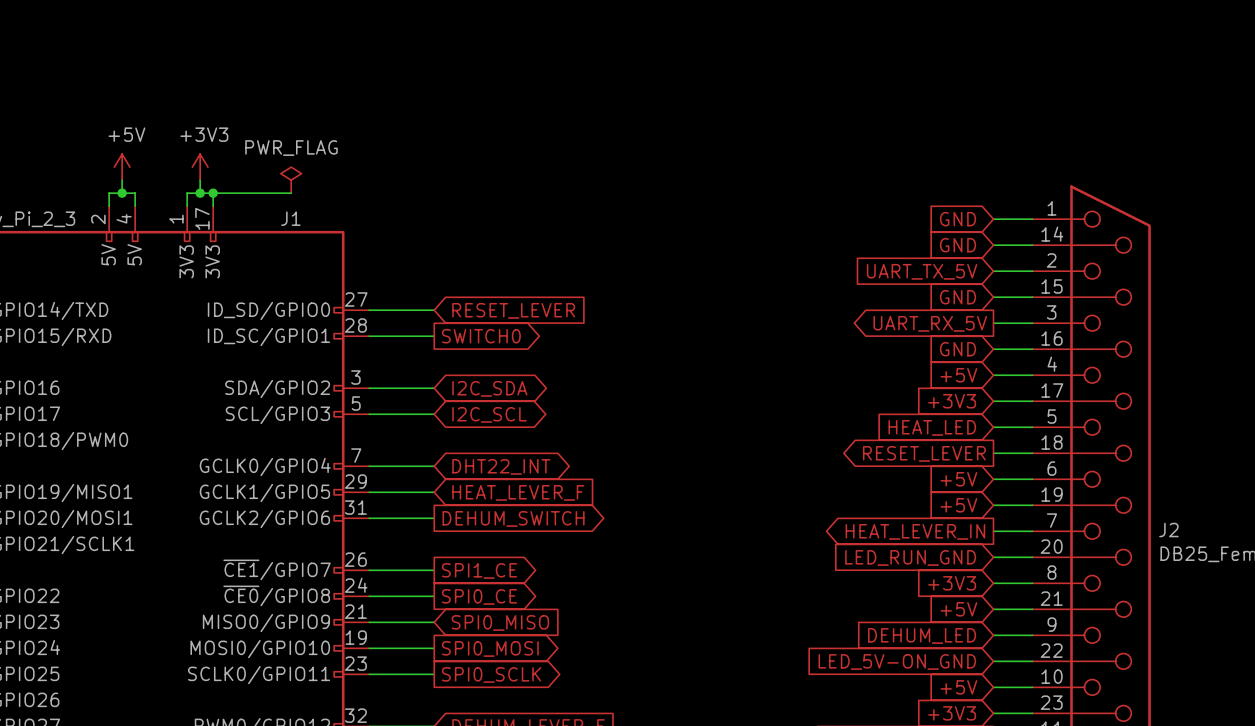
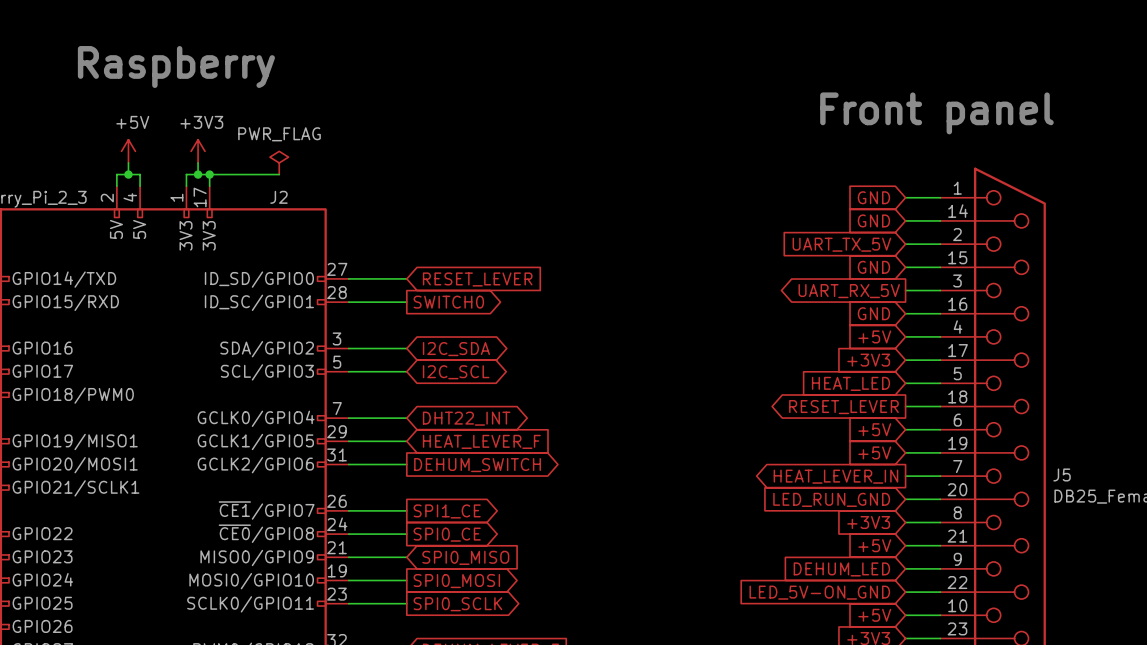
text: none -> Raspberry (176, 67)
text: none -> Front panel (936, 113)
J1 name: J1 (290, 218) -> J2 (278, 197)
J2 name: J2 (1168, 530) -> J5 (1062, 474)

